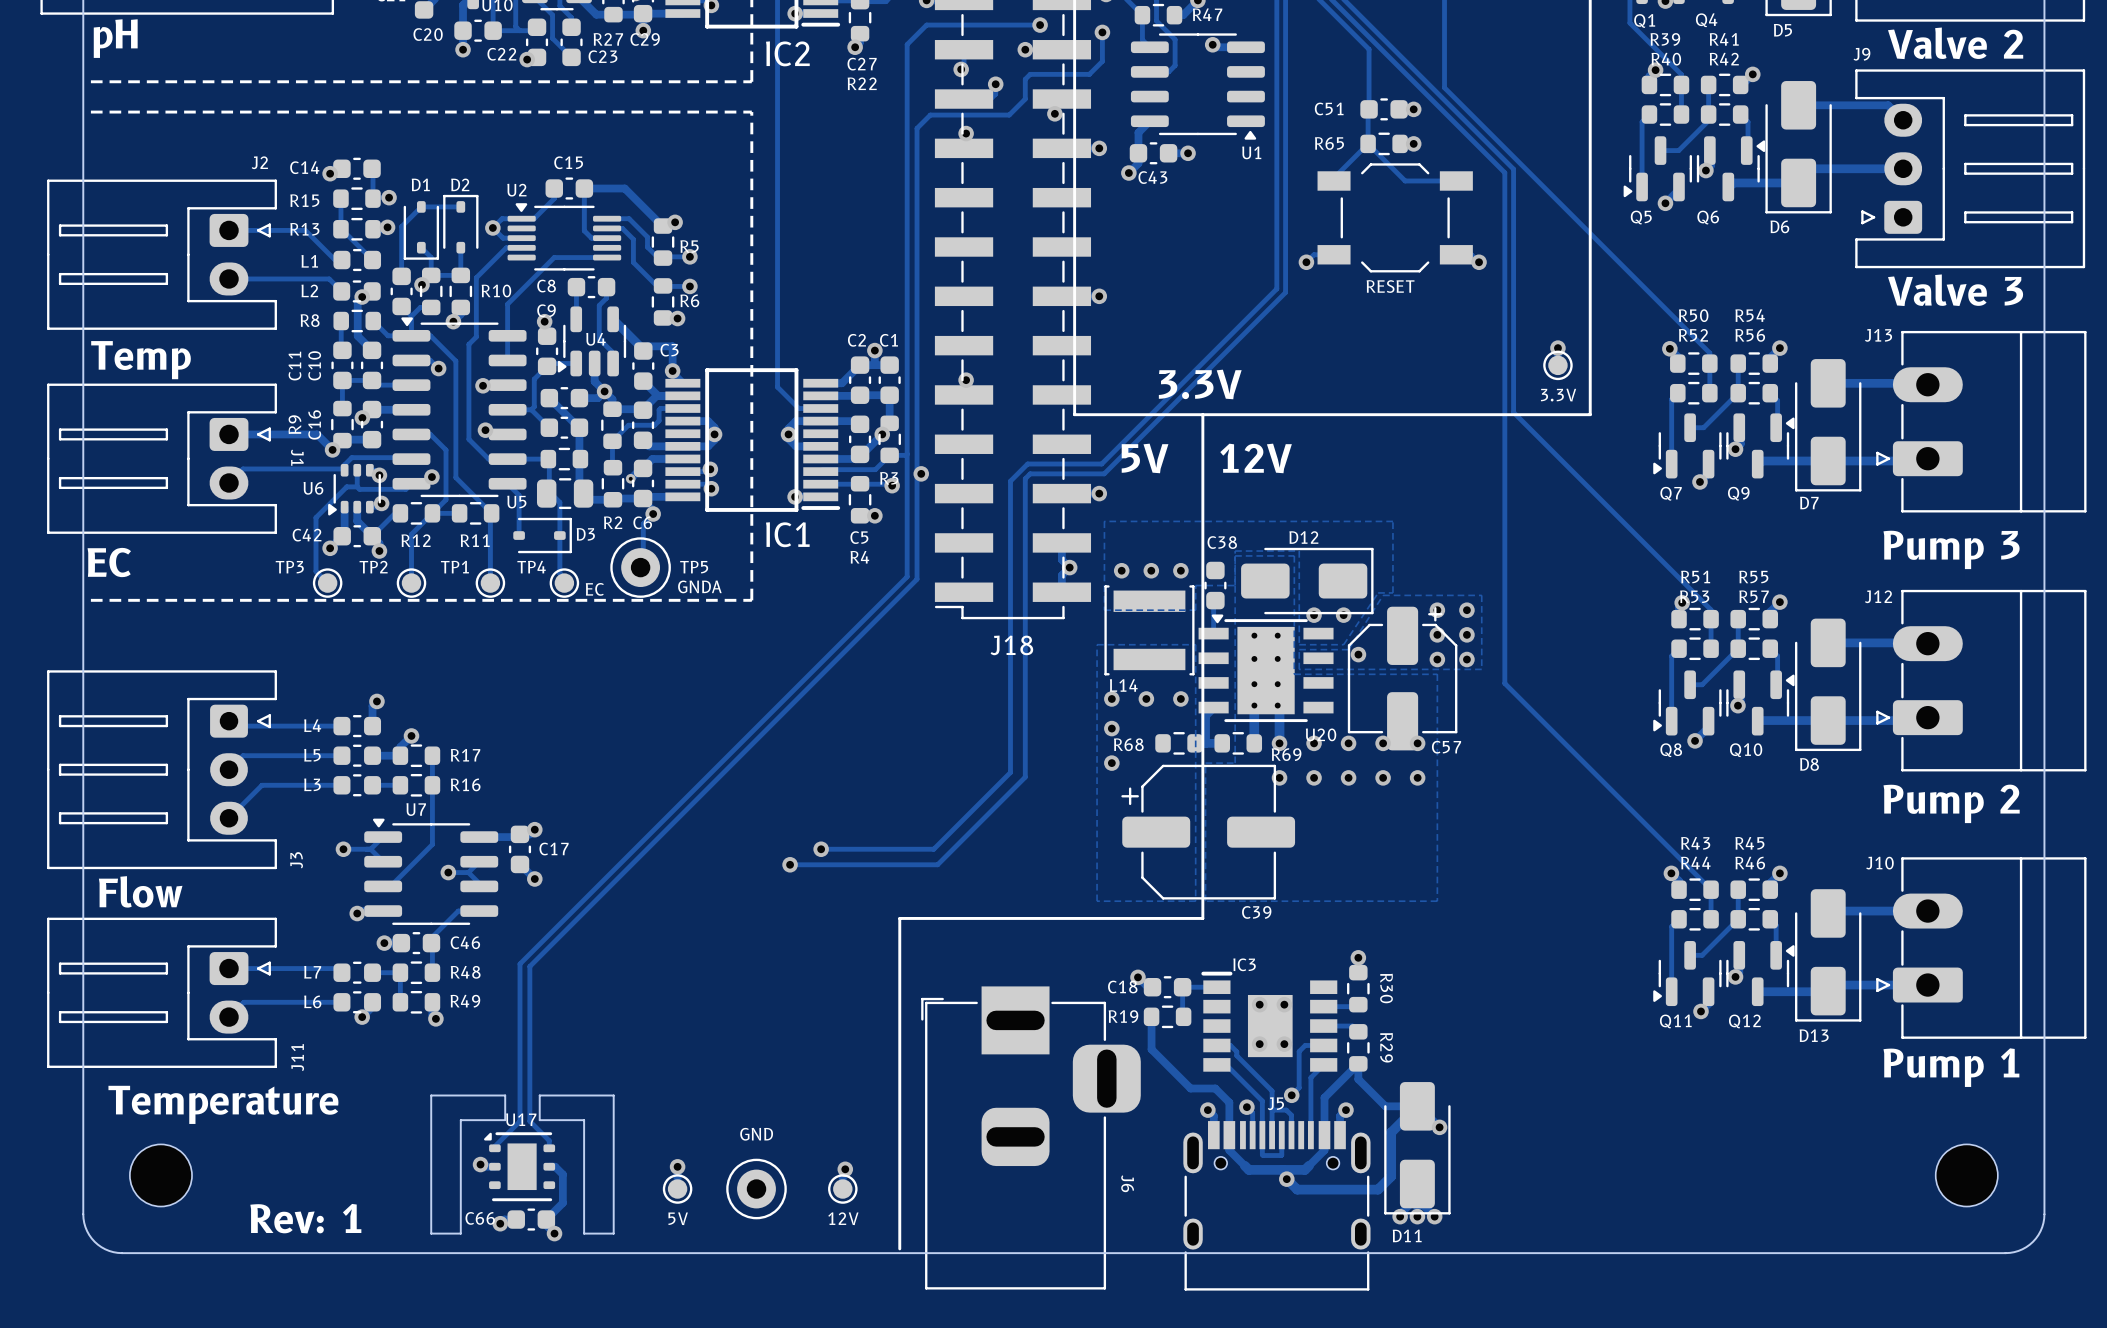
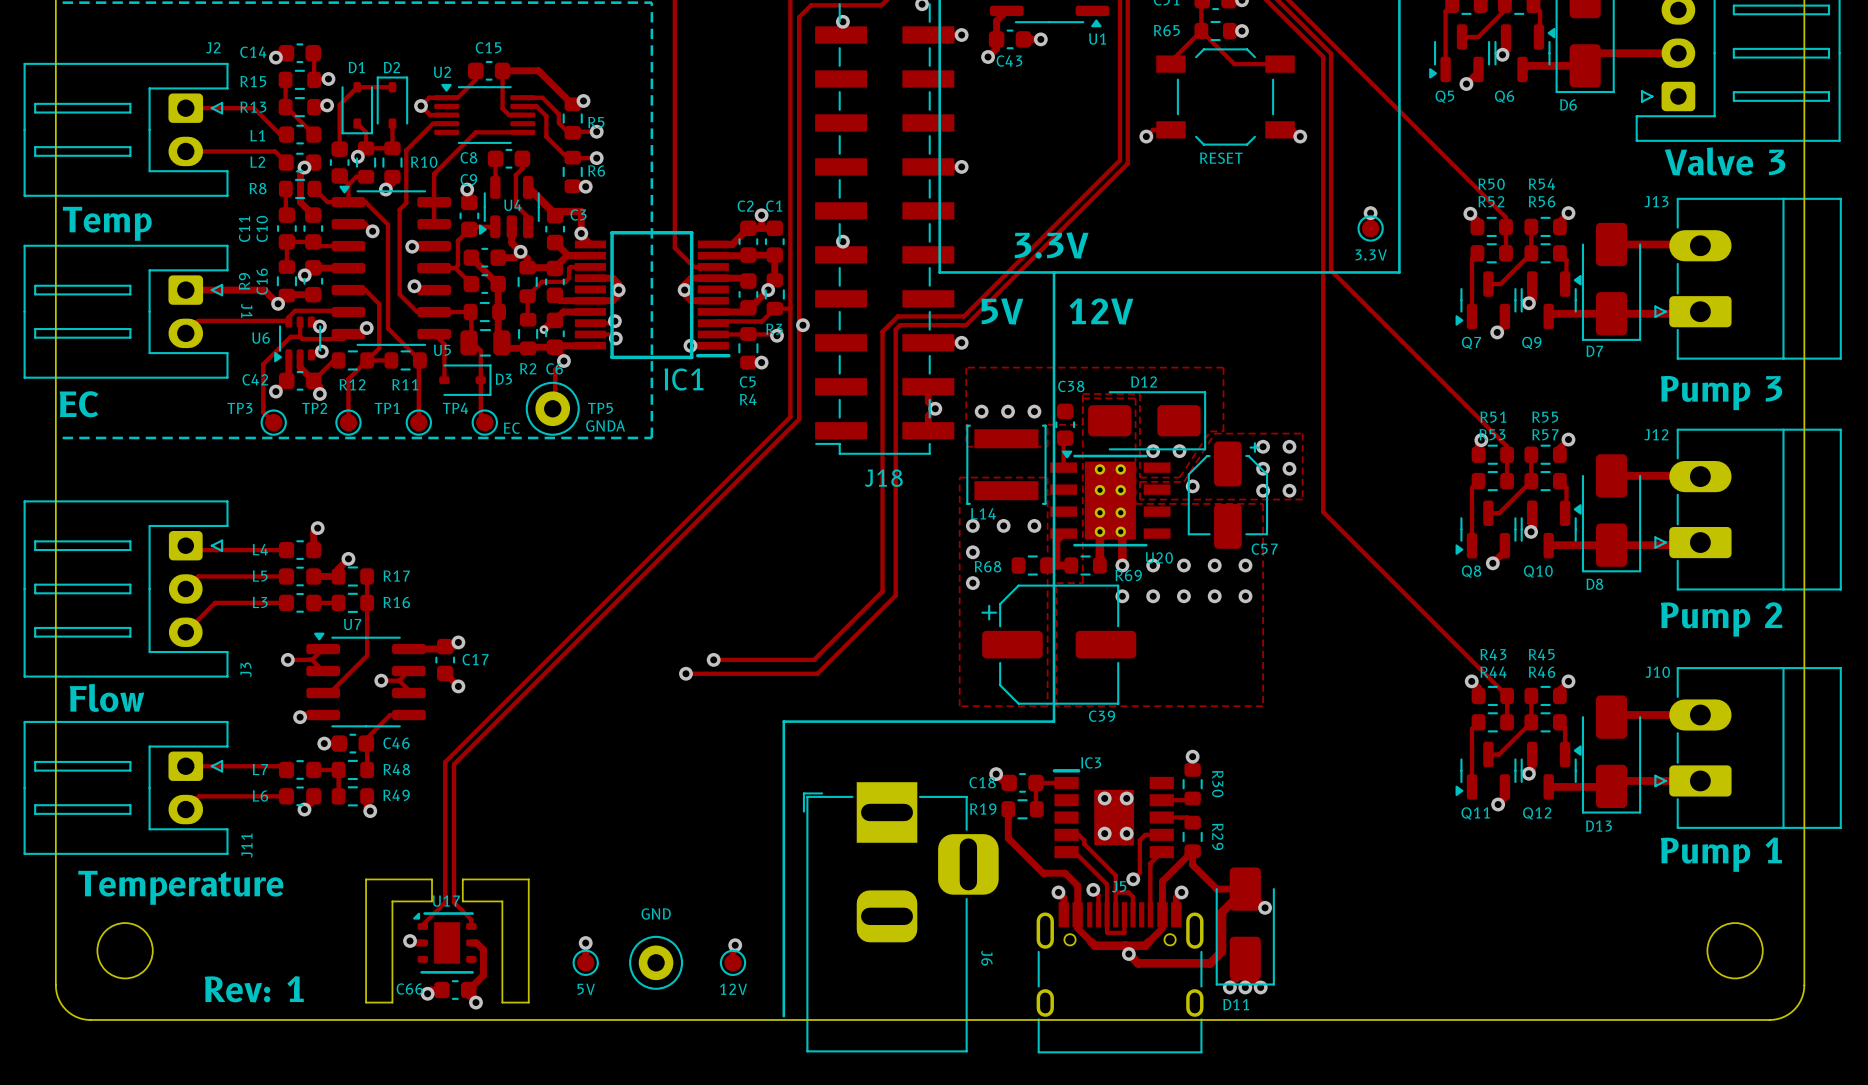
C57 footprint: [1347, 606, 1458, 751] -> [1187, 441, 1269, 549]

